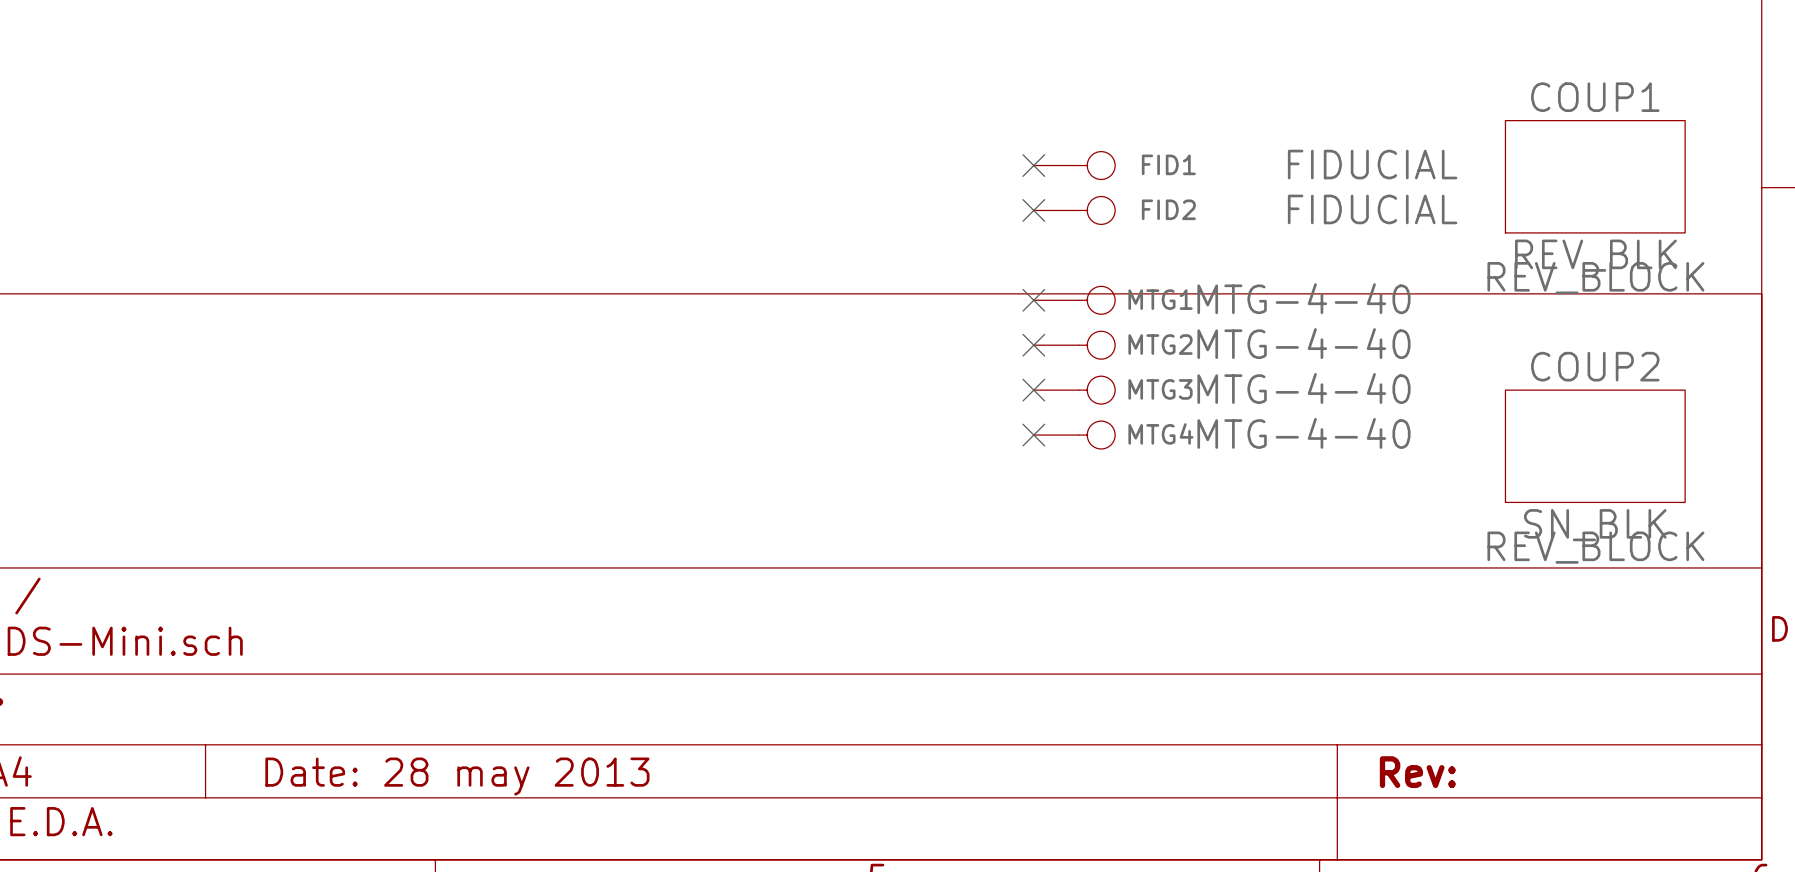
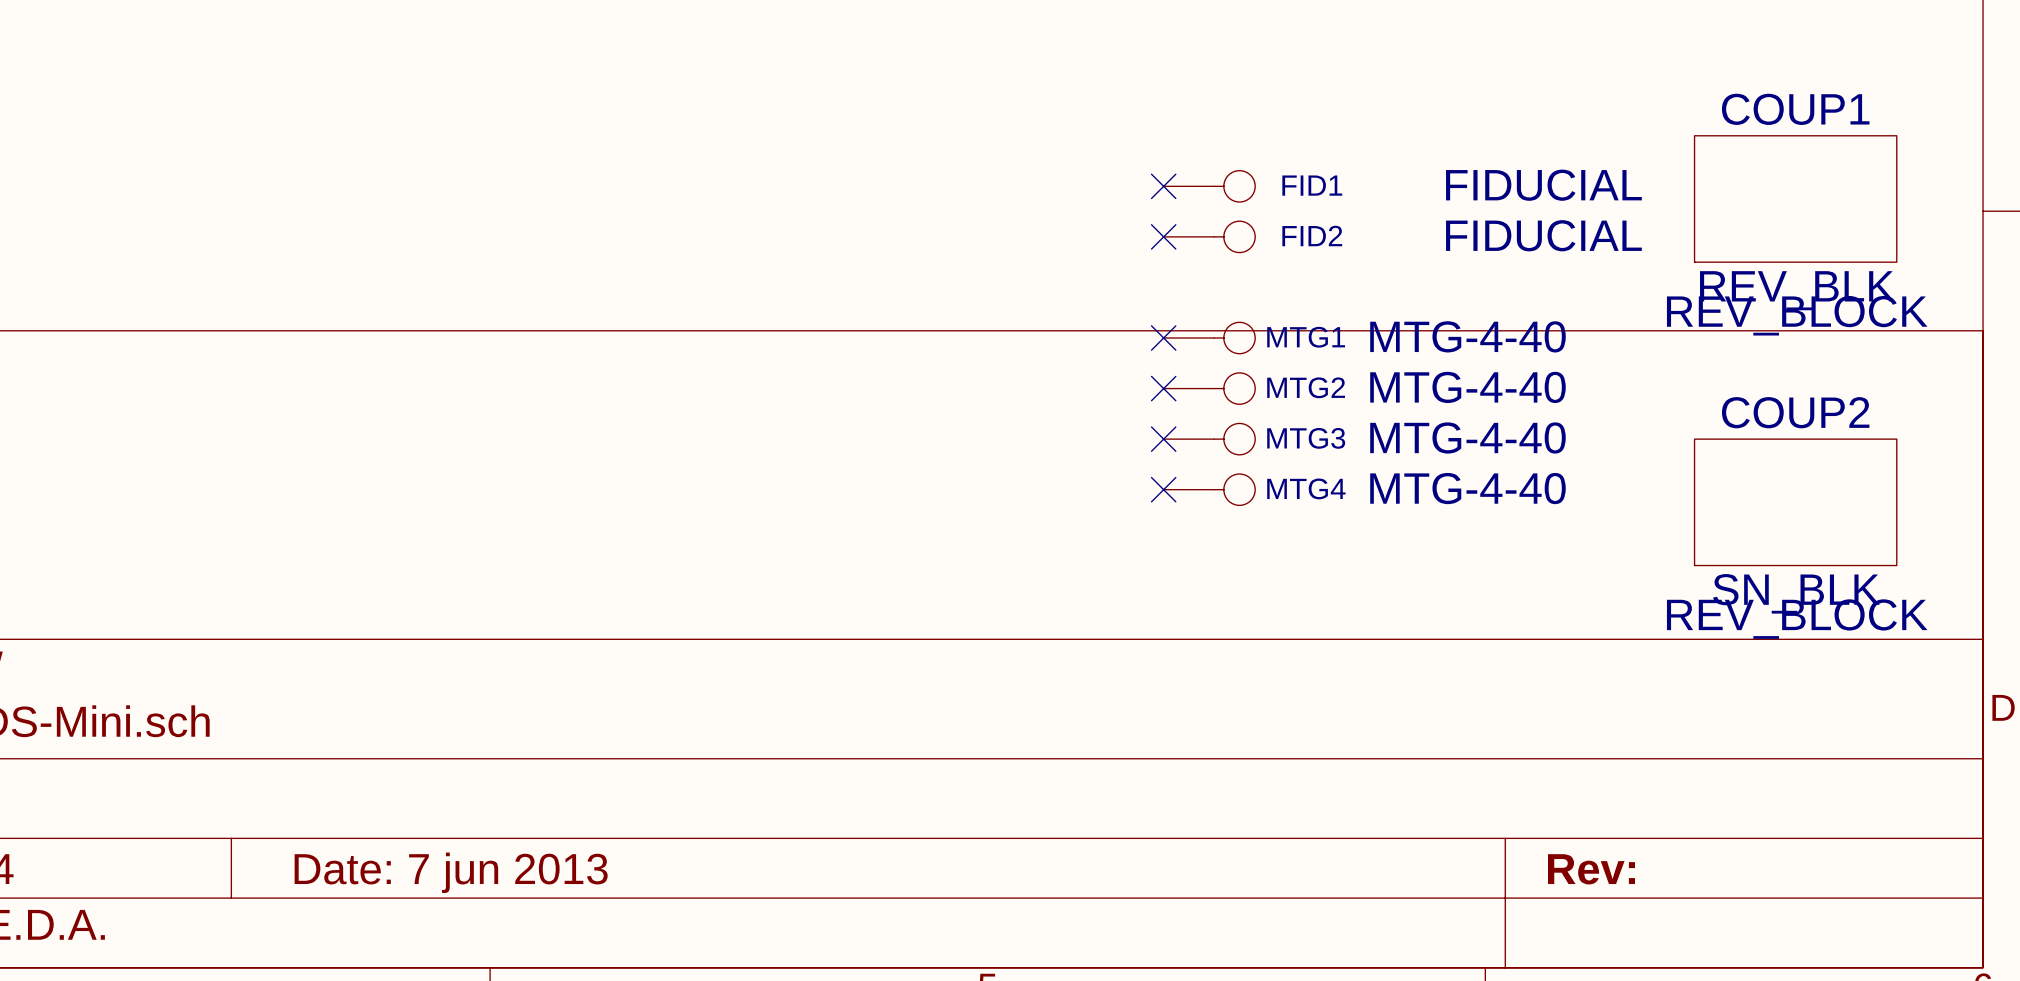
title block: Date: 28 may 2013 (457, 776) -> Date: 7 jun 2013 (451, 872)

